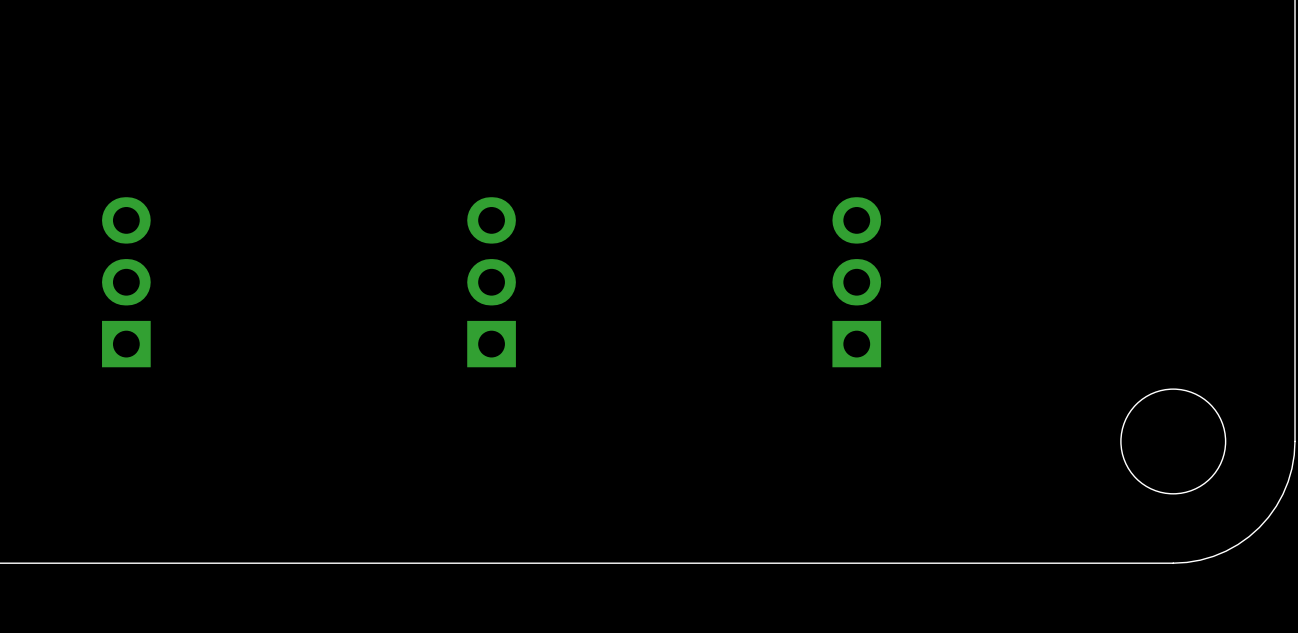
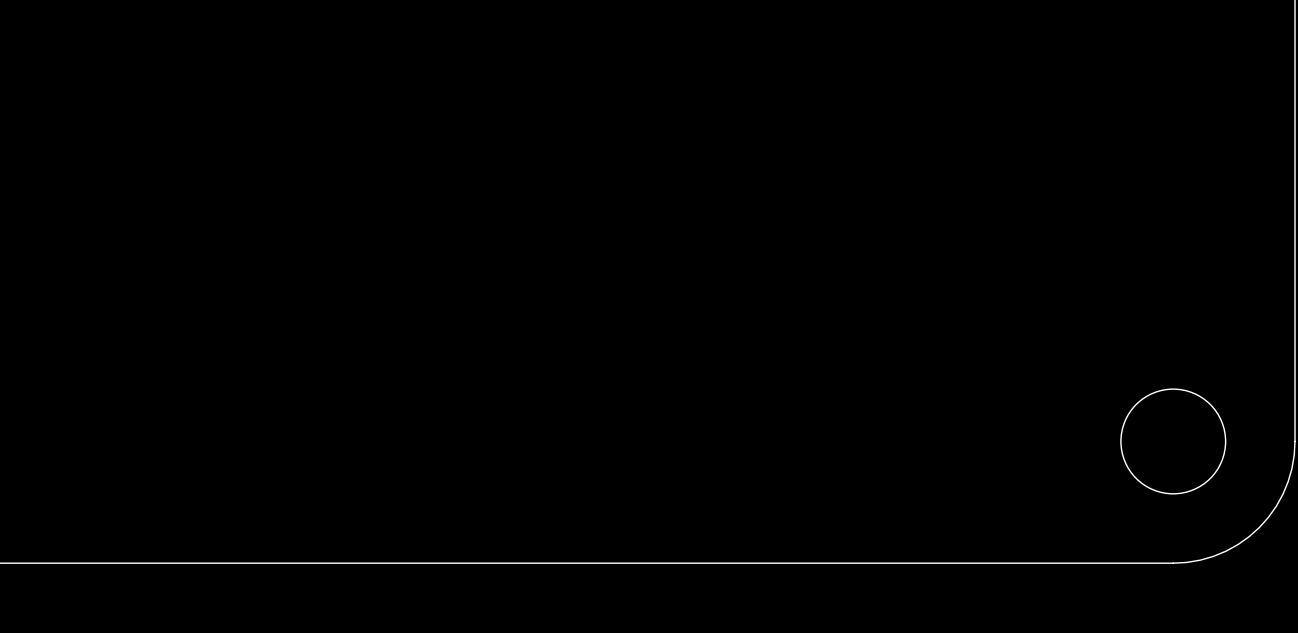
part: (126, 282) -> none
part: (491, 282) -> none
part: (856, 282) -> none

